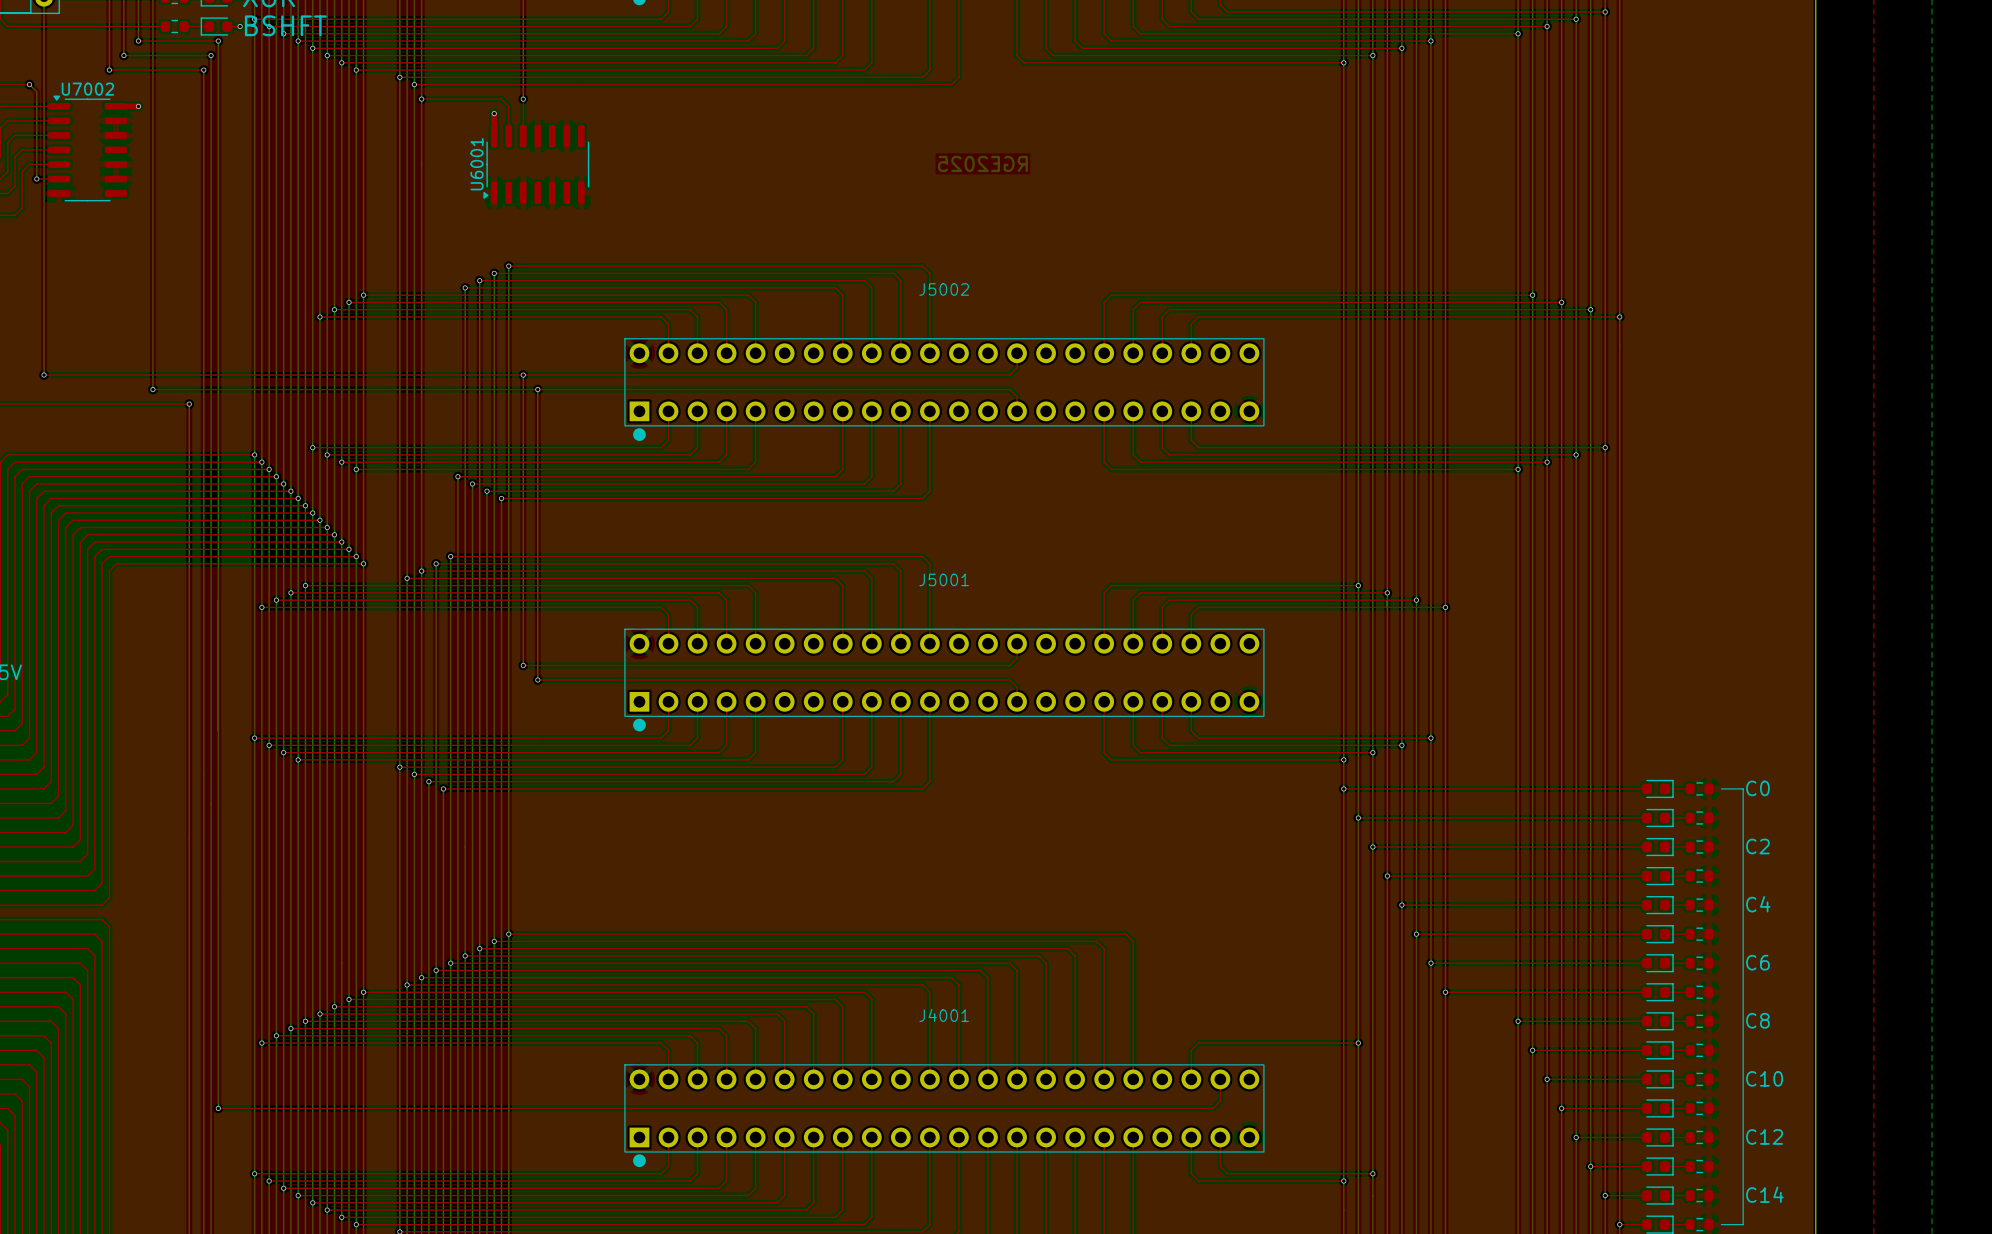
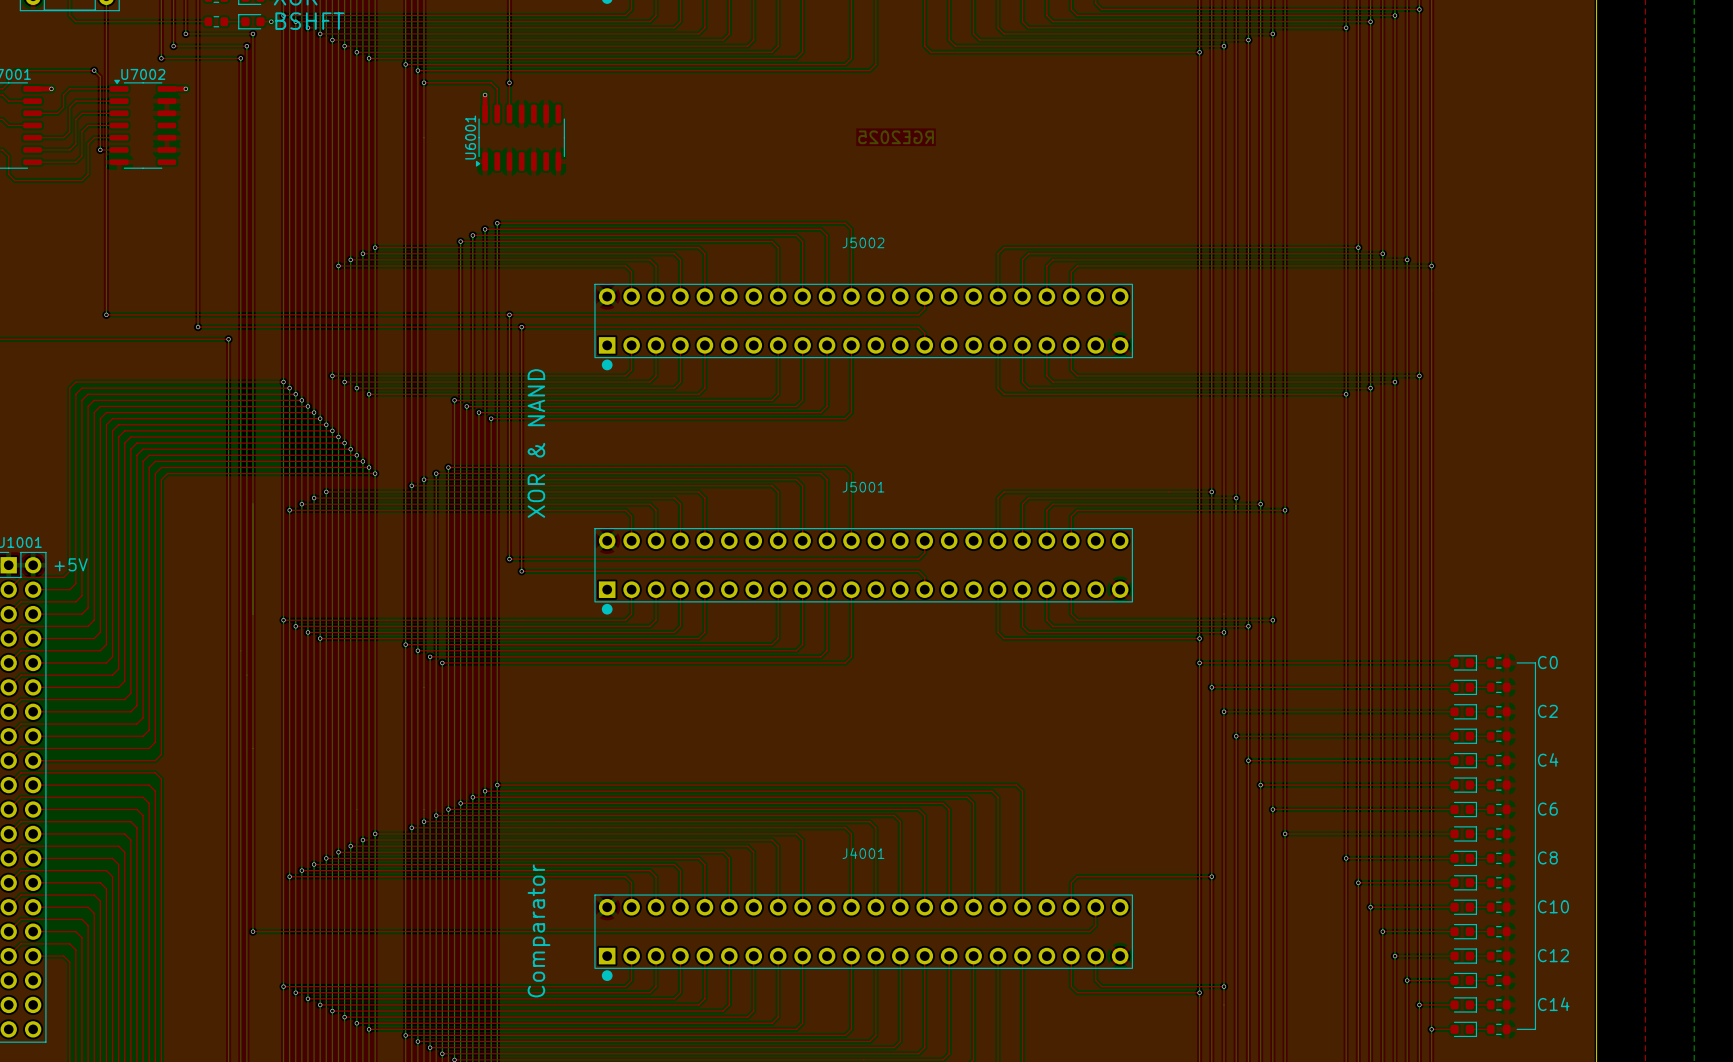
text: none -> XOR & NAND (536, 443)
text: none -> Comparator (539, 930)

